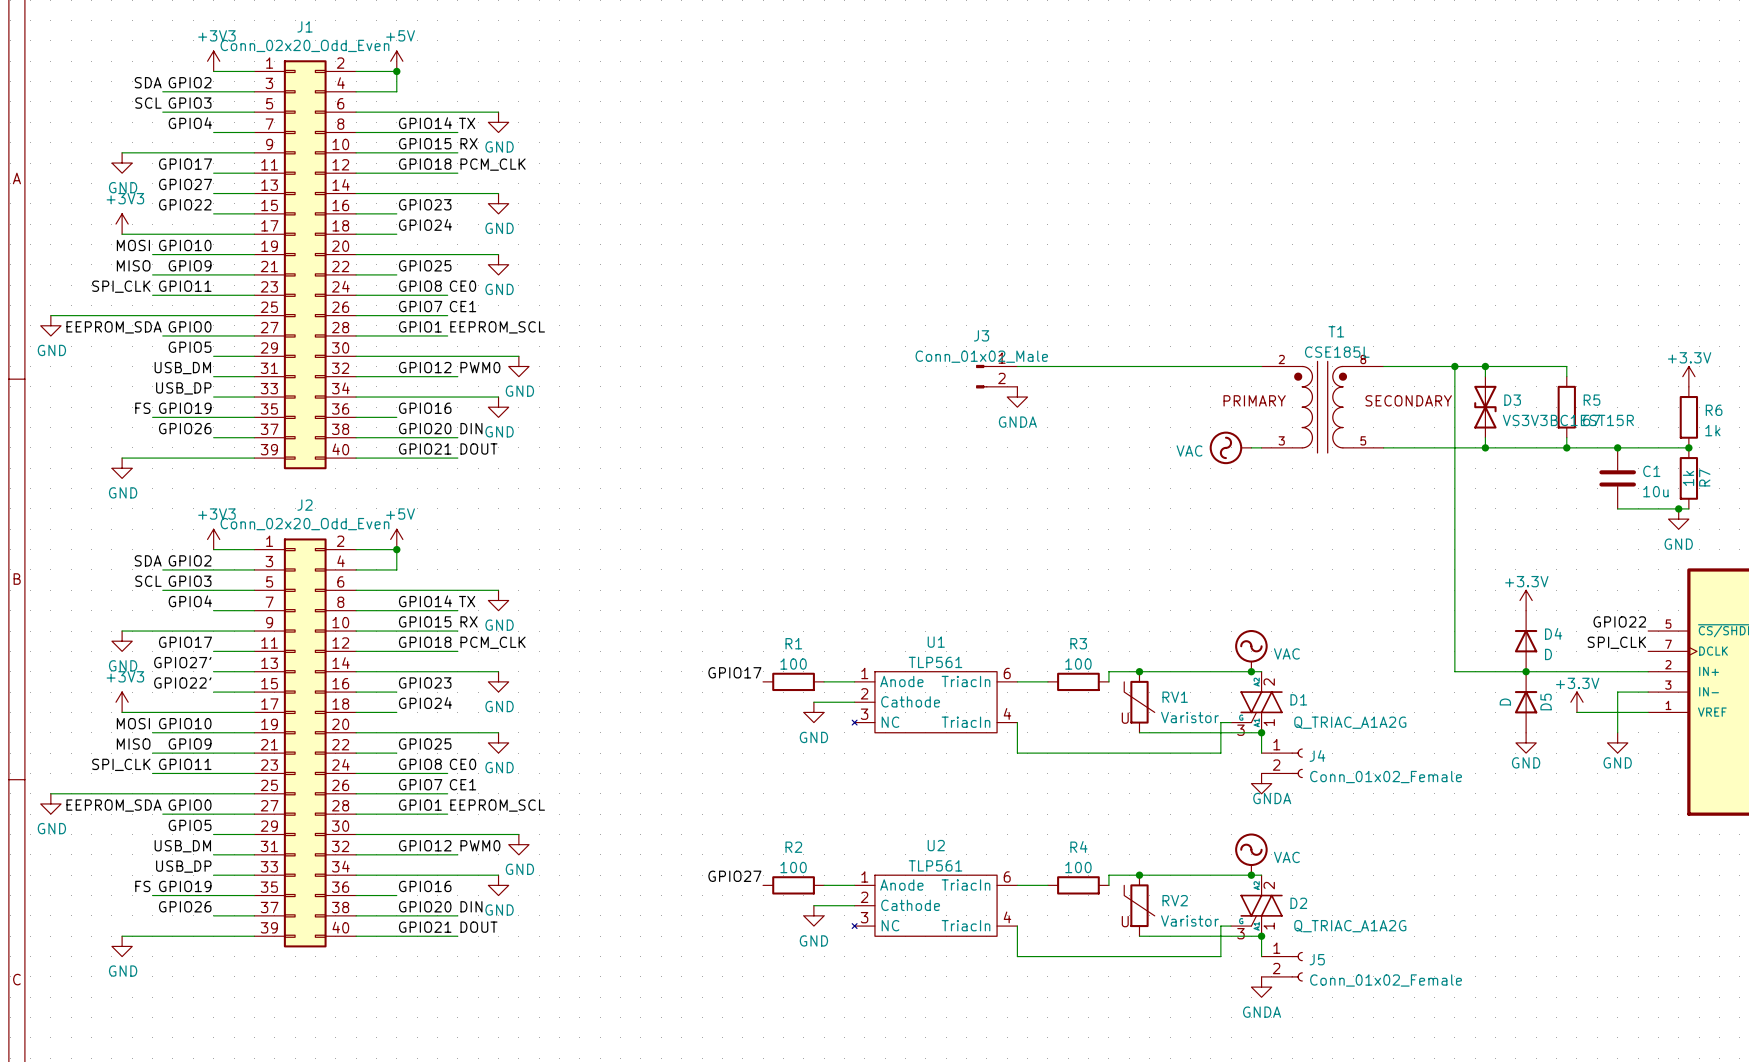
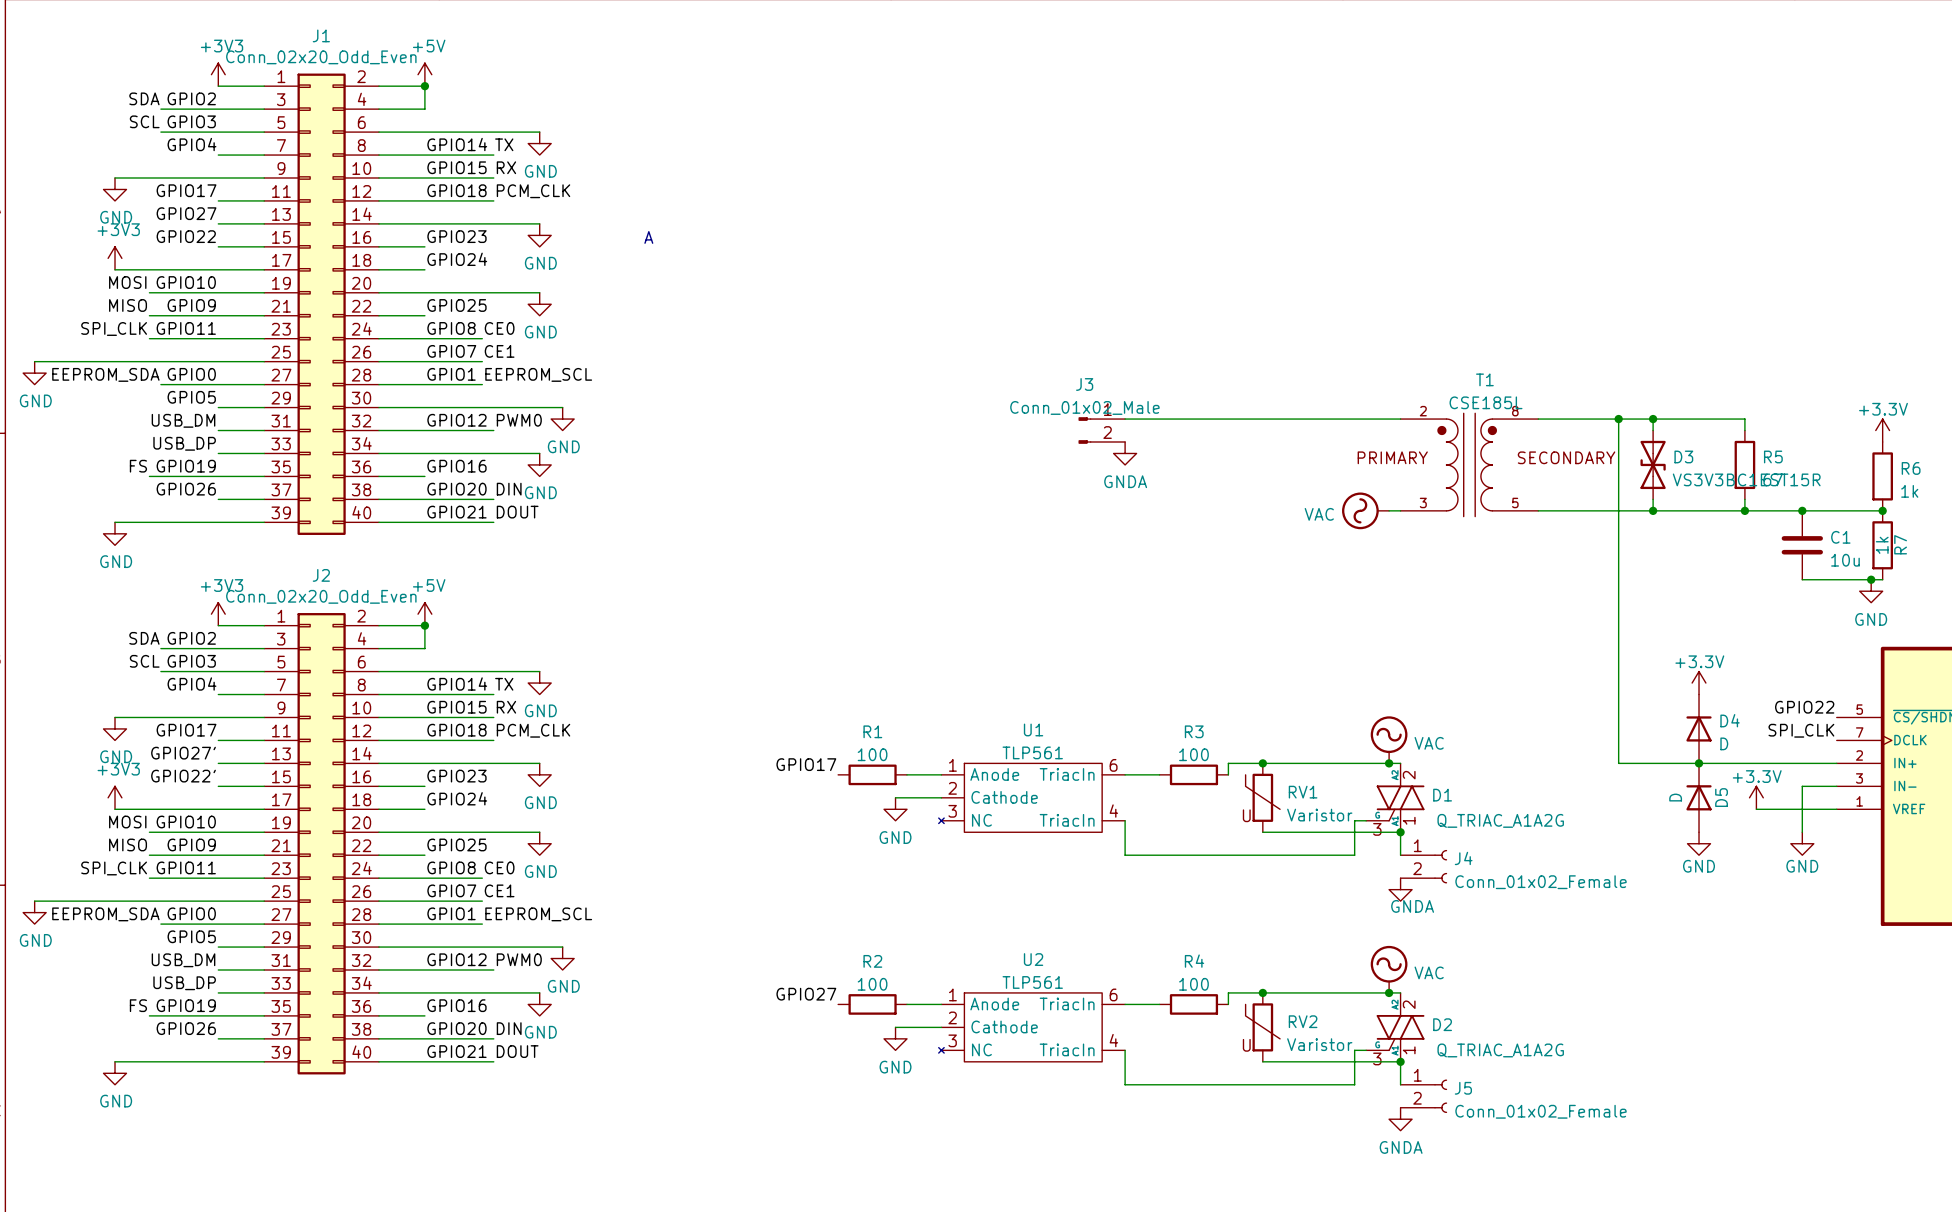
text: none -> A (648, 237)

